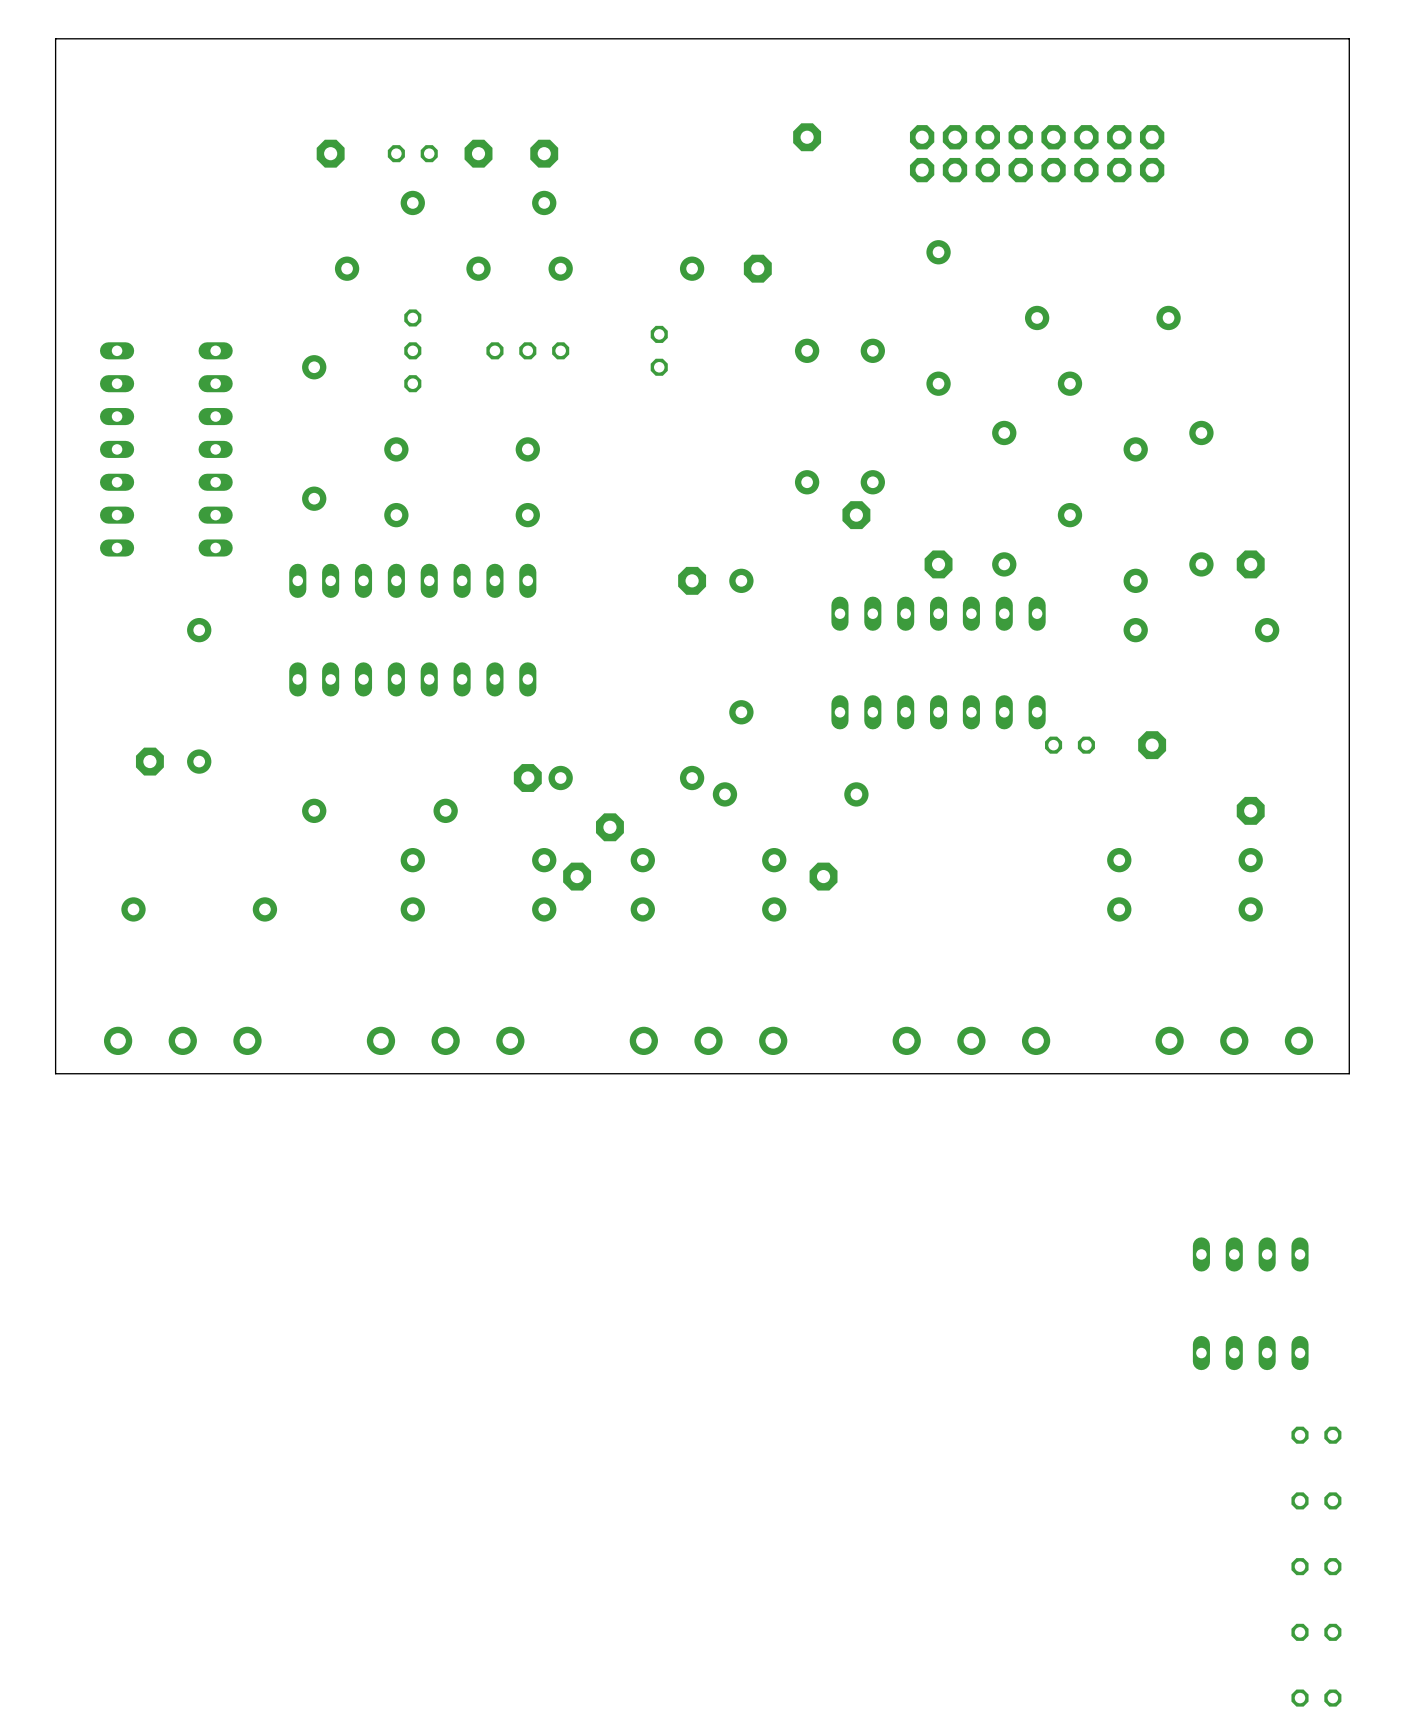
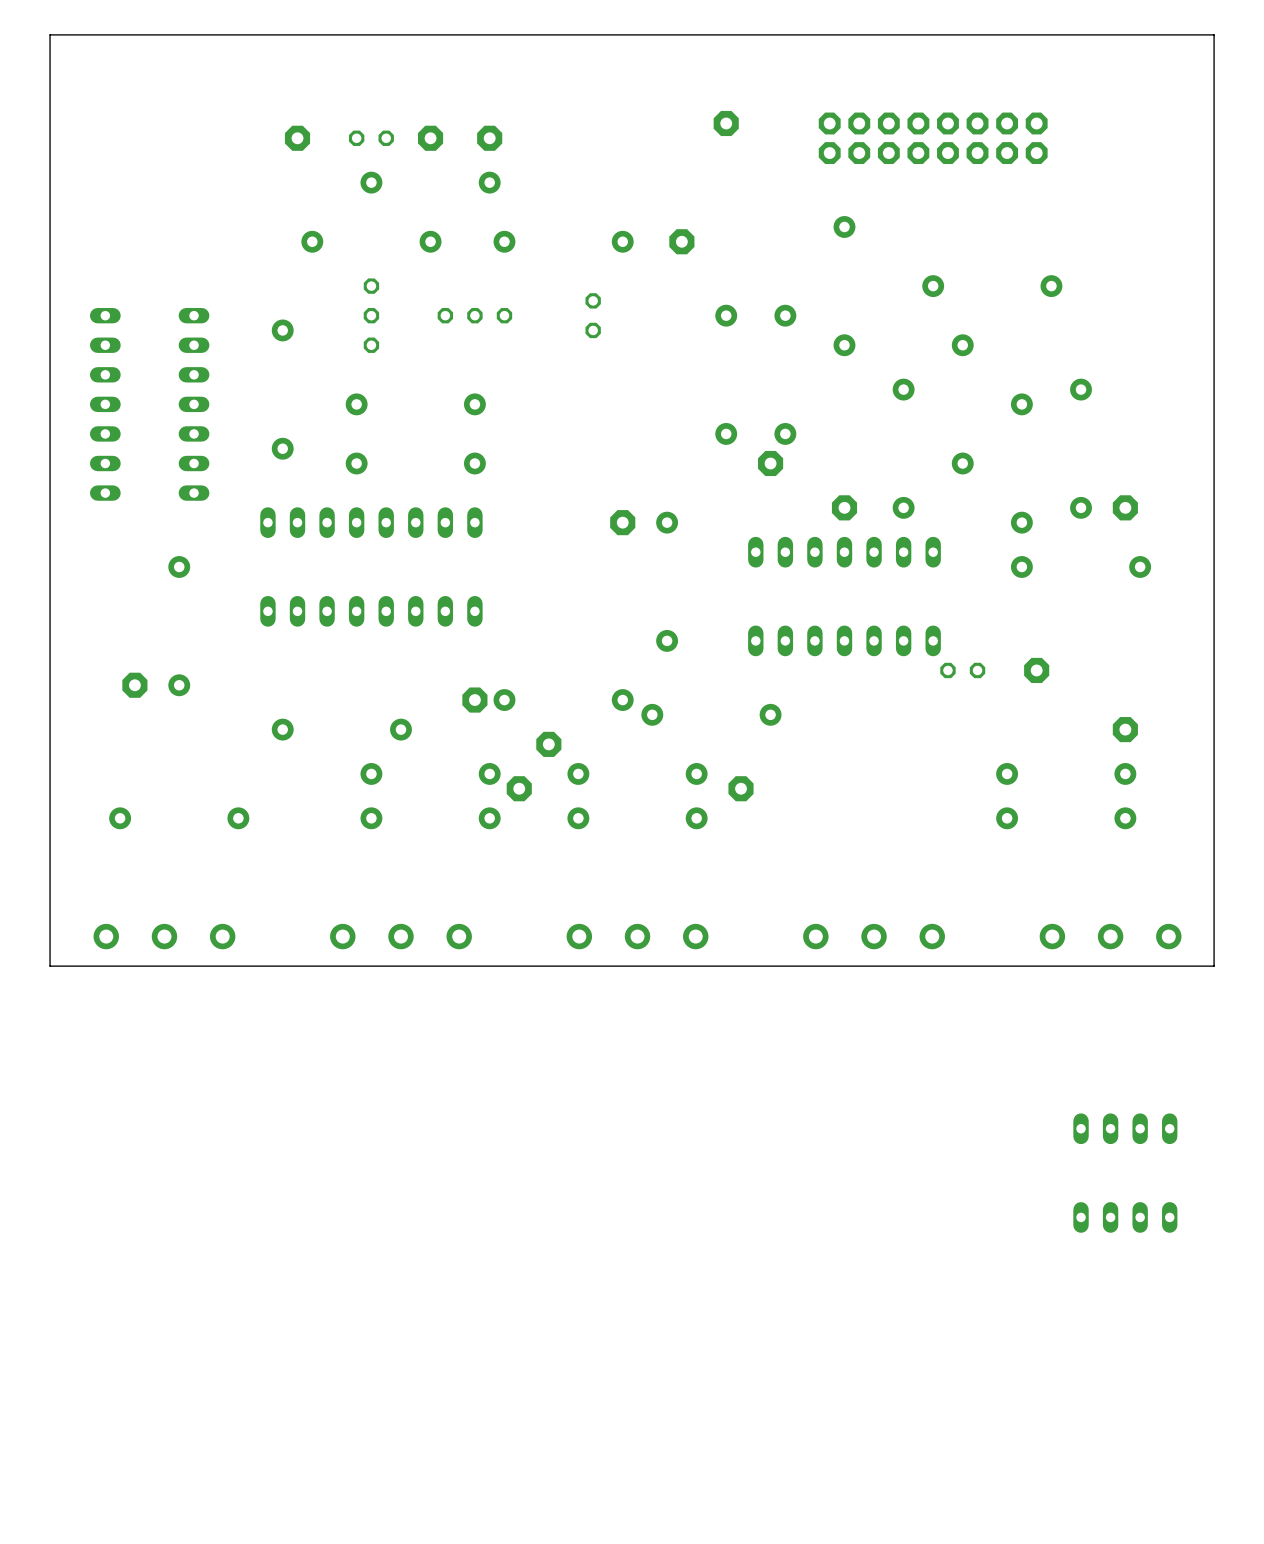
part: (1316, 1435) -> none
part: (1316, 1500) -> none
part: (1316, 1566) -> none
part: (1316, 1632) -> none
part: (1316, 1698) -> none

